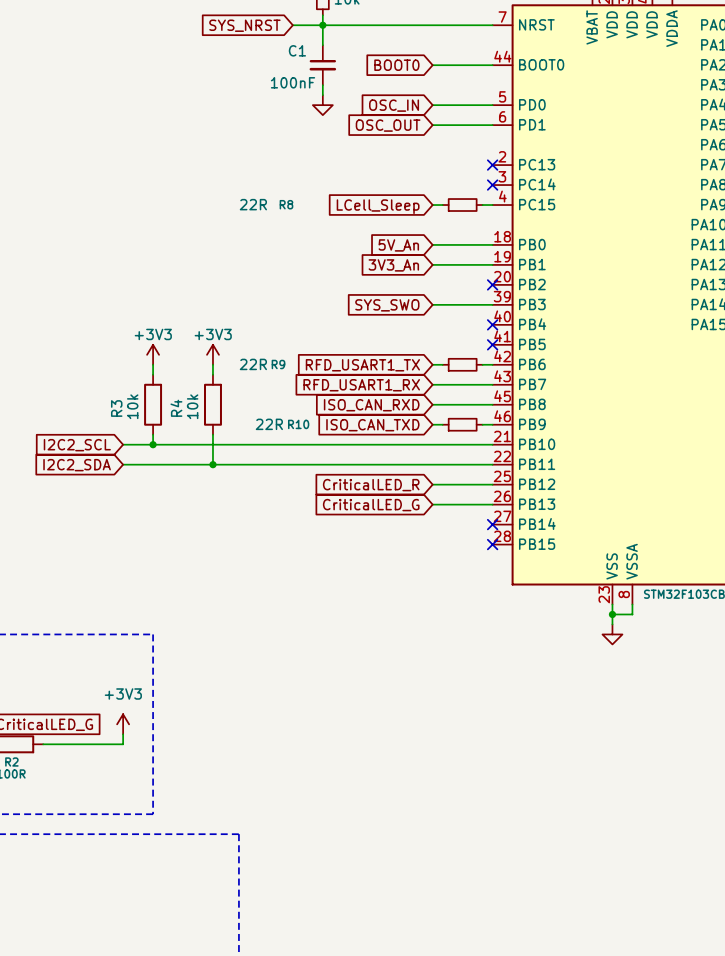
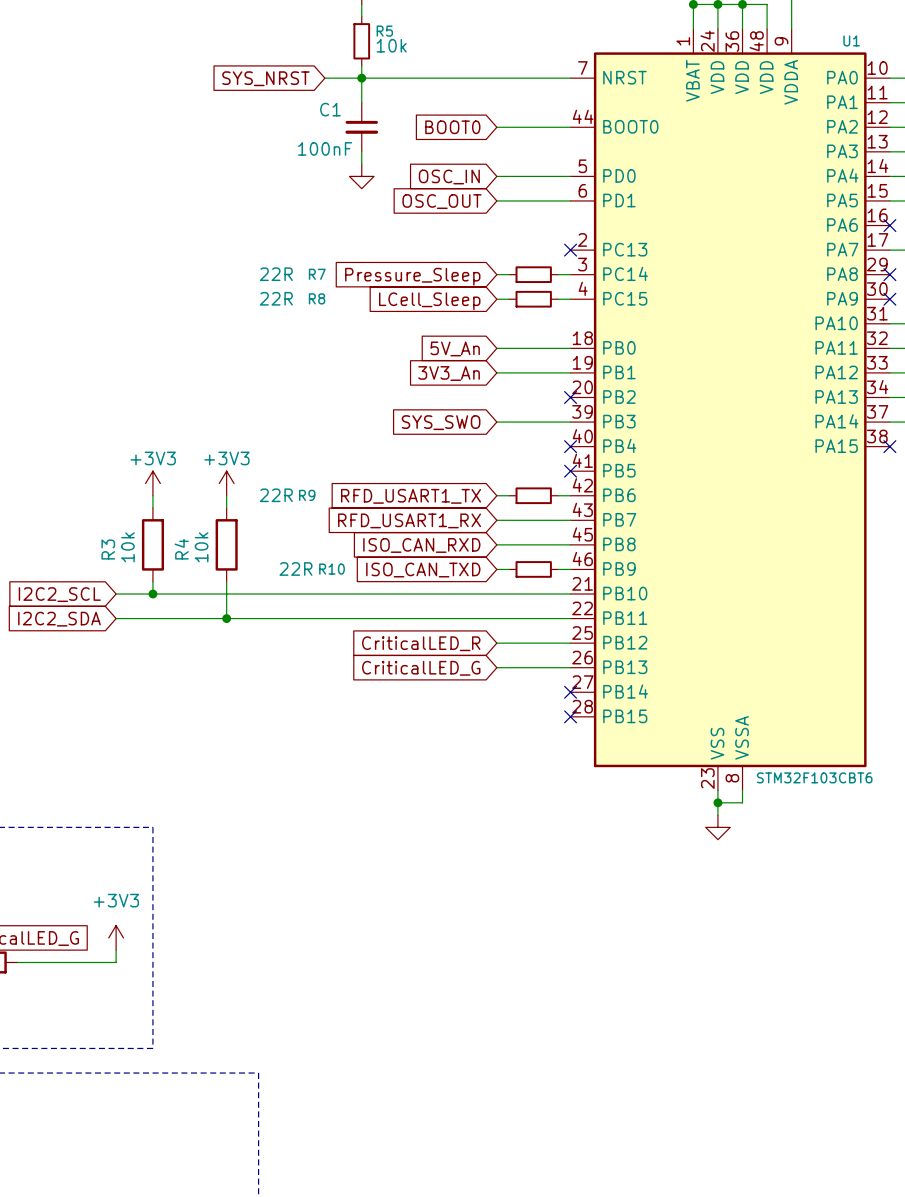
wire: none -> (496, 274) (509, 274)
R7: none -> 22R (533, 274)
wire: none -> (558, 274) (570, 274)
no-connect mark: (492, 185) -> none
global label: none -> Pressure_Sleep (412, 276)

